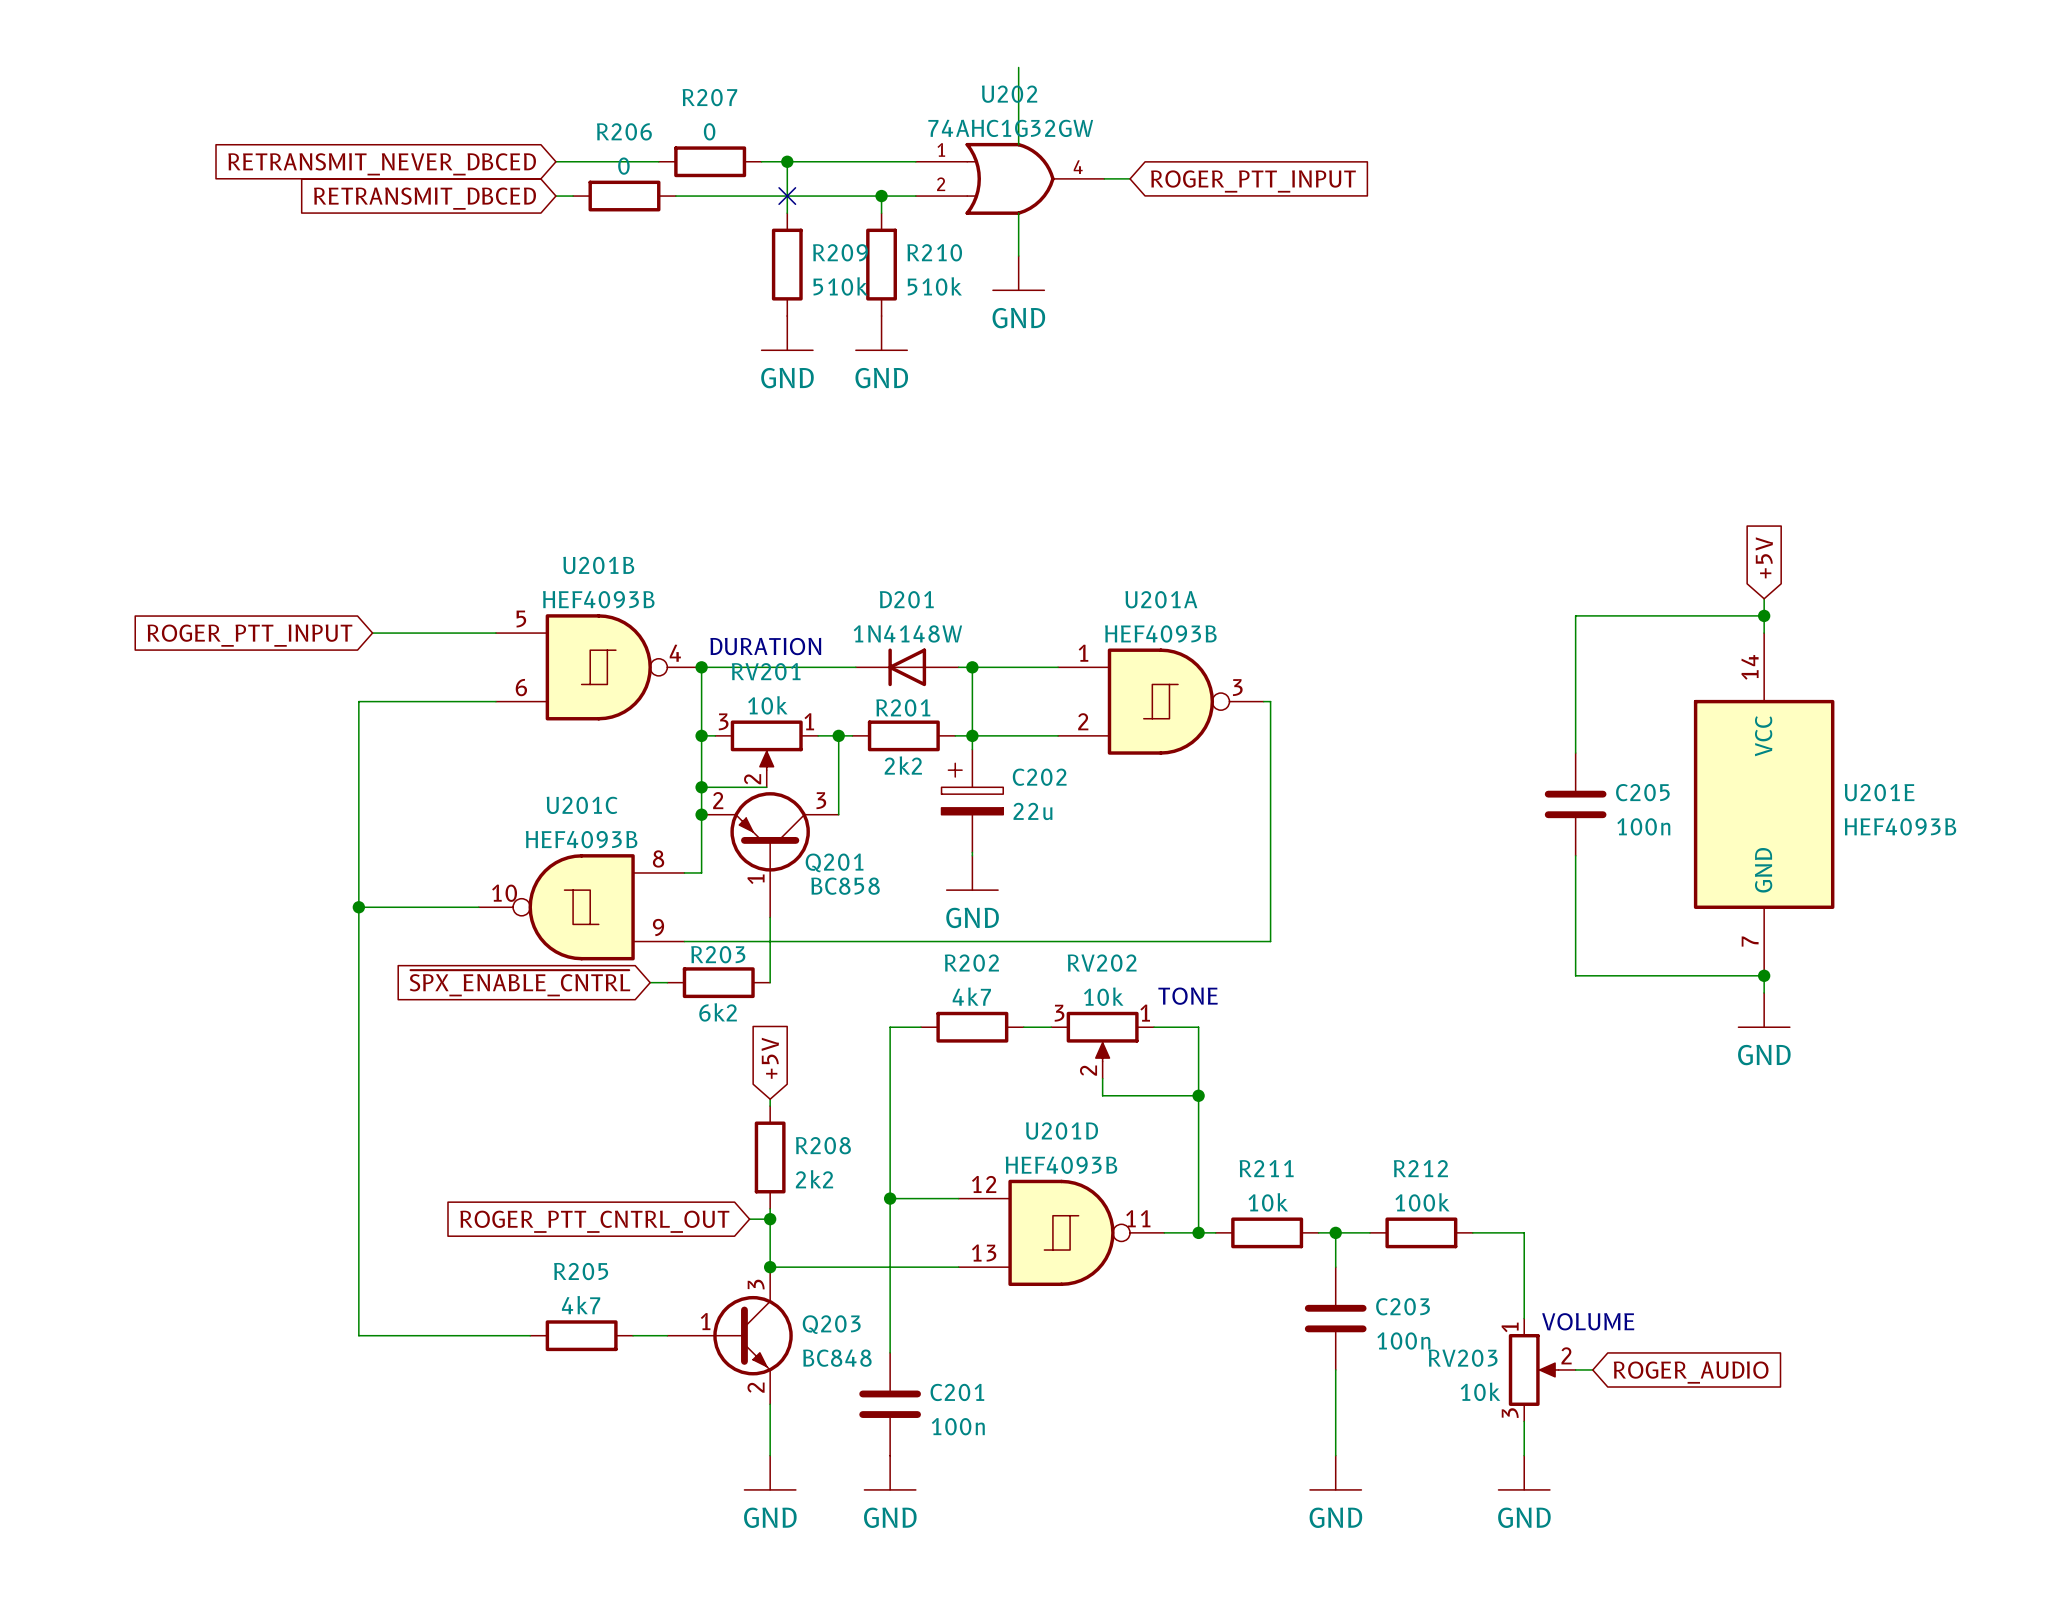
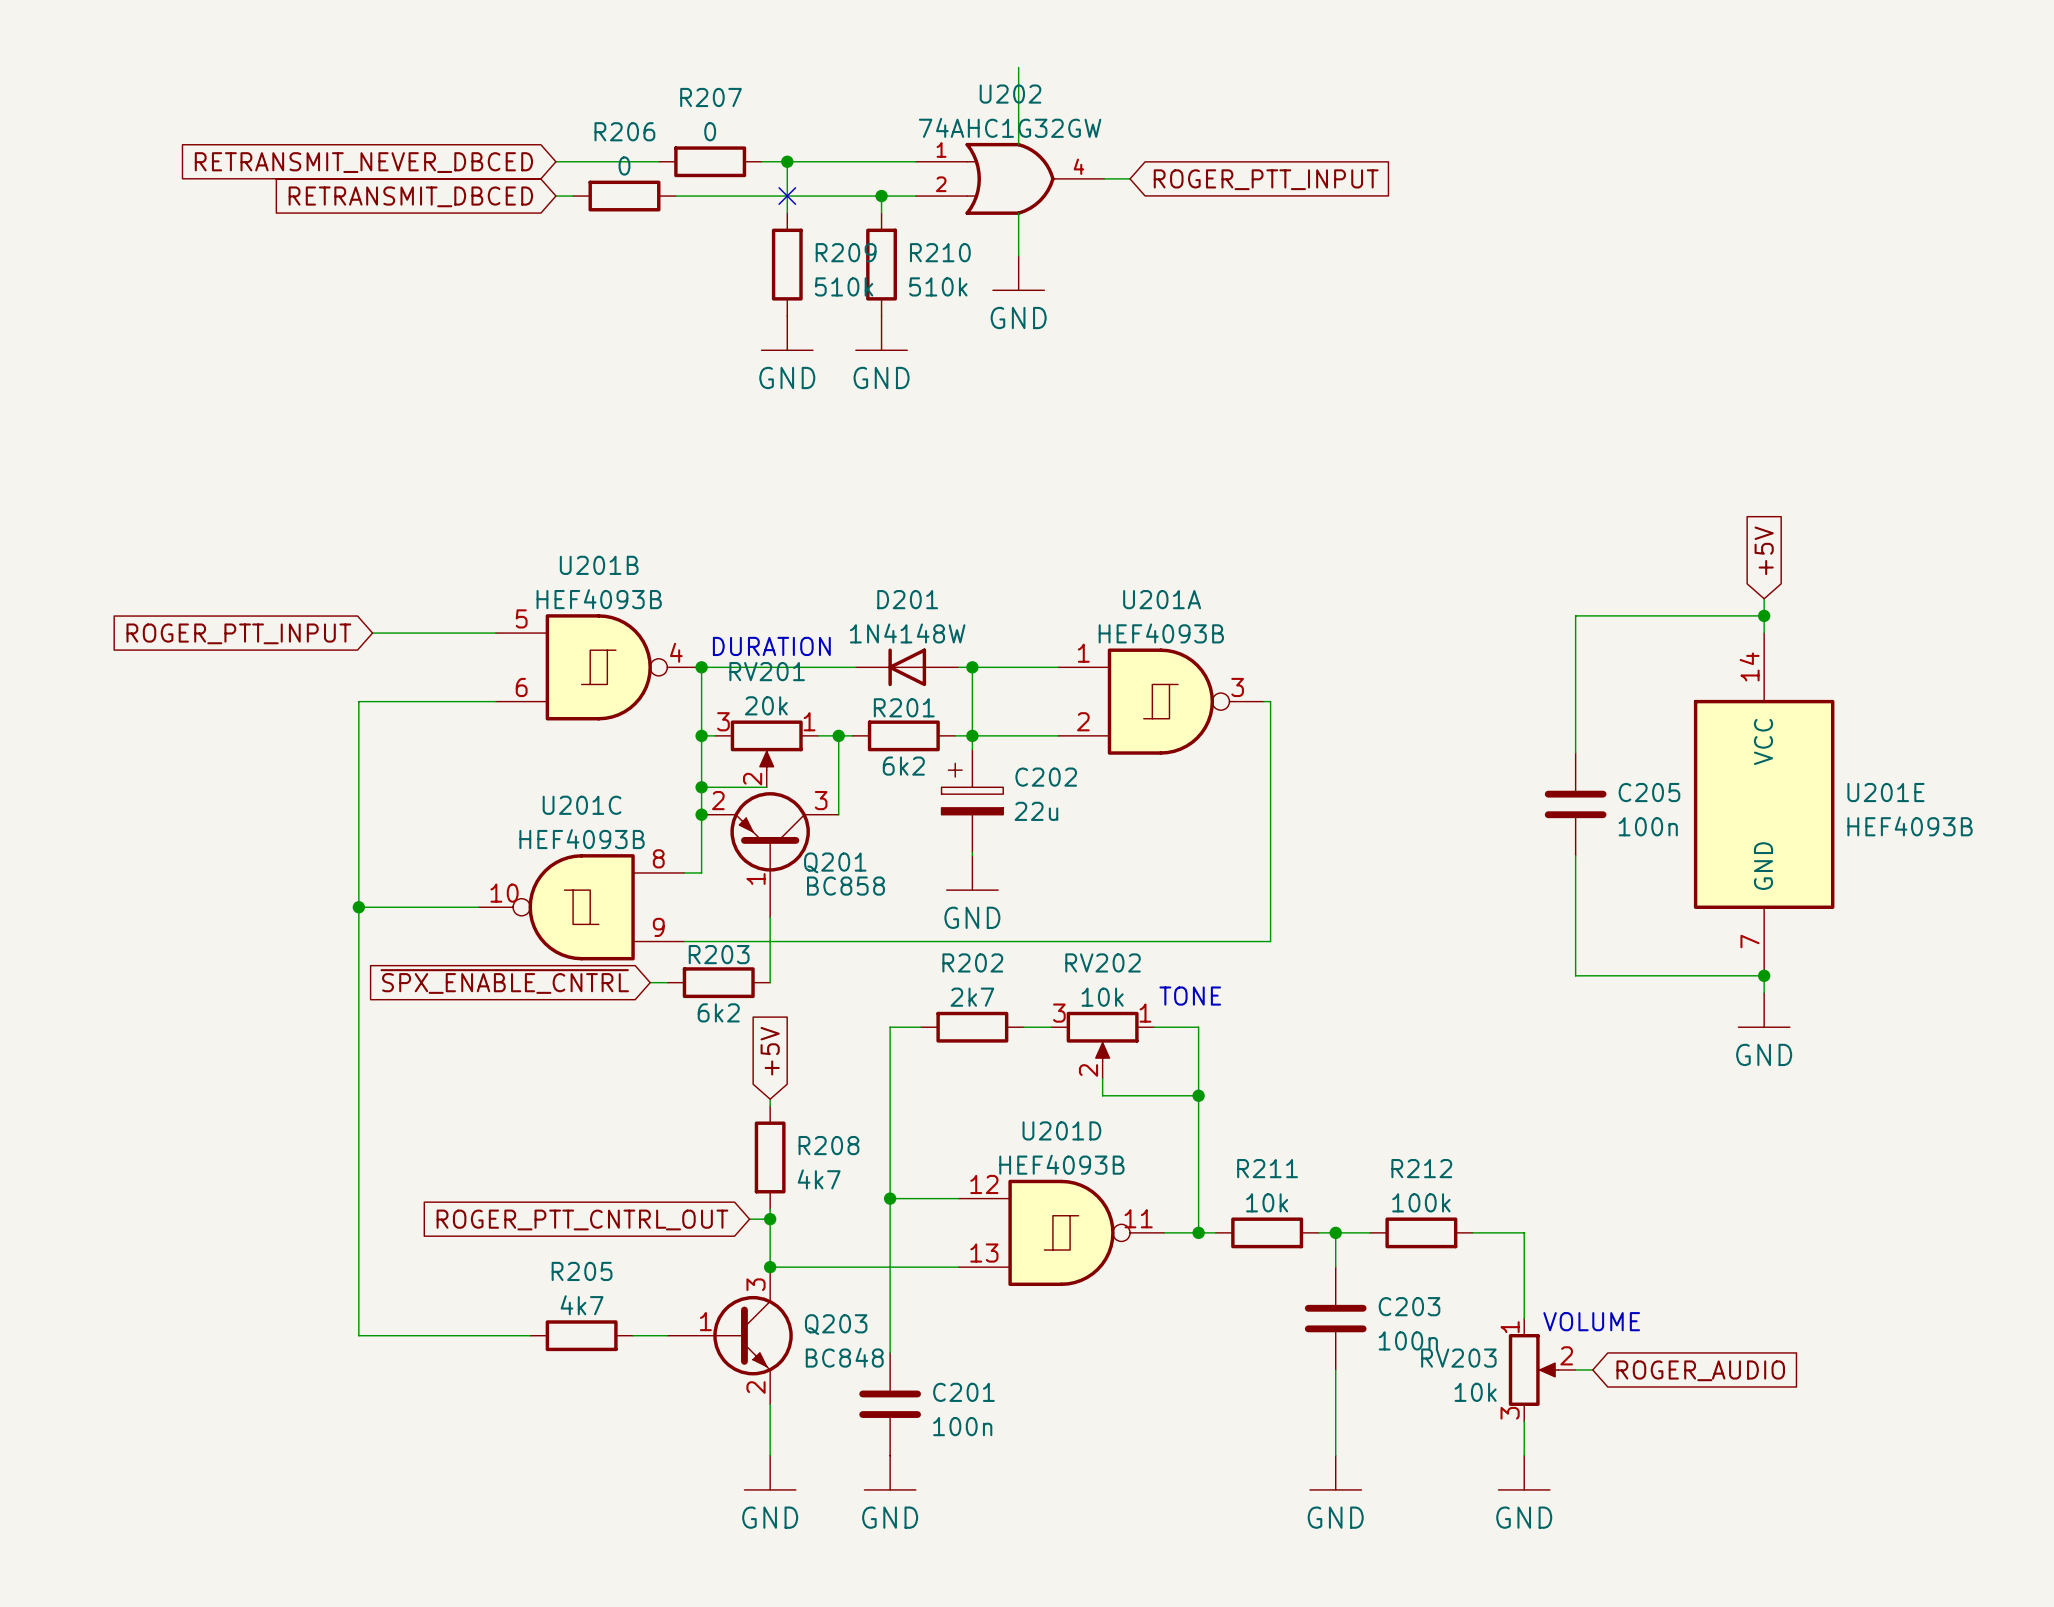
RV201 value: 10k (767, 705) -> 20k (766, 705)
R201 value: 2k2 (903, 765) -> 6k2 (903, 766)
R202 value: 4k7 (971, 996) -> 2k7 (972, 997)
R208 value: 2k2 (814, 1179) -> 4k7 (819, 1179)

